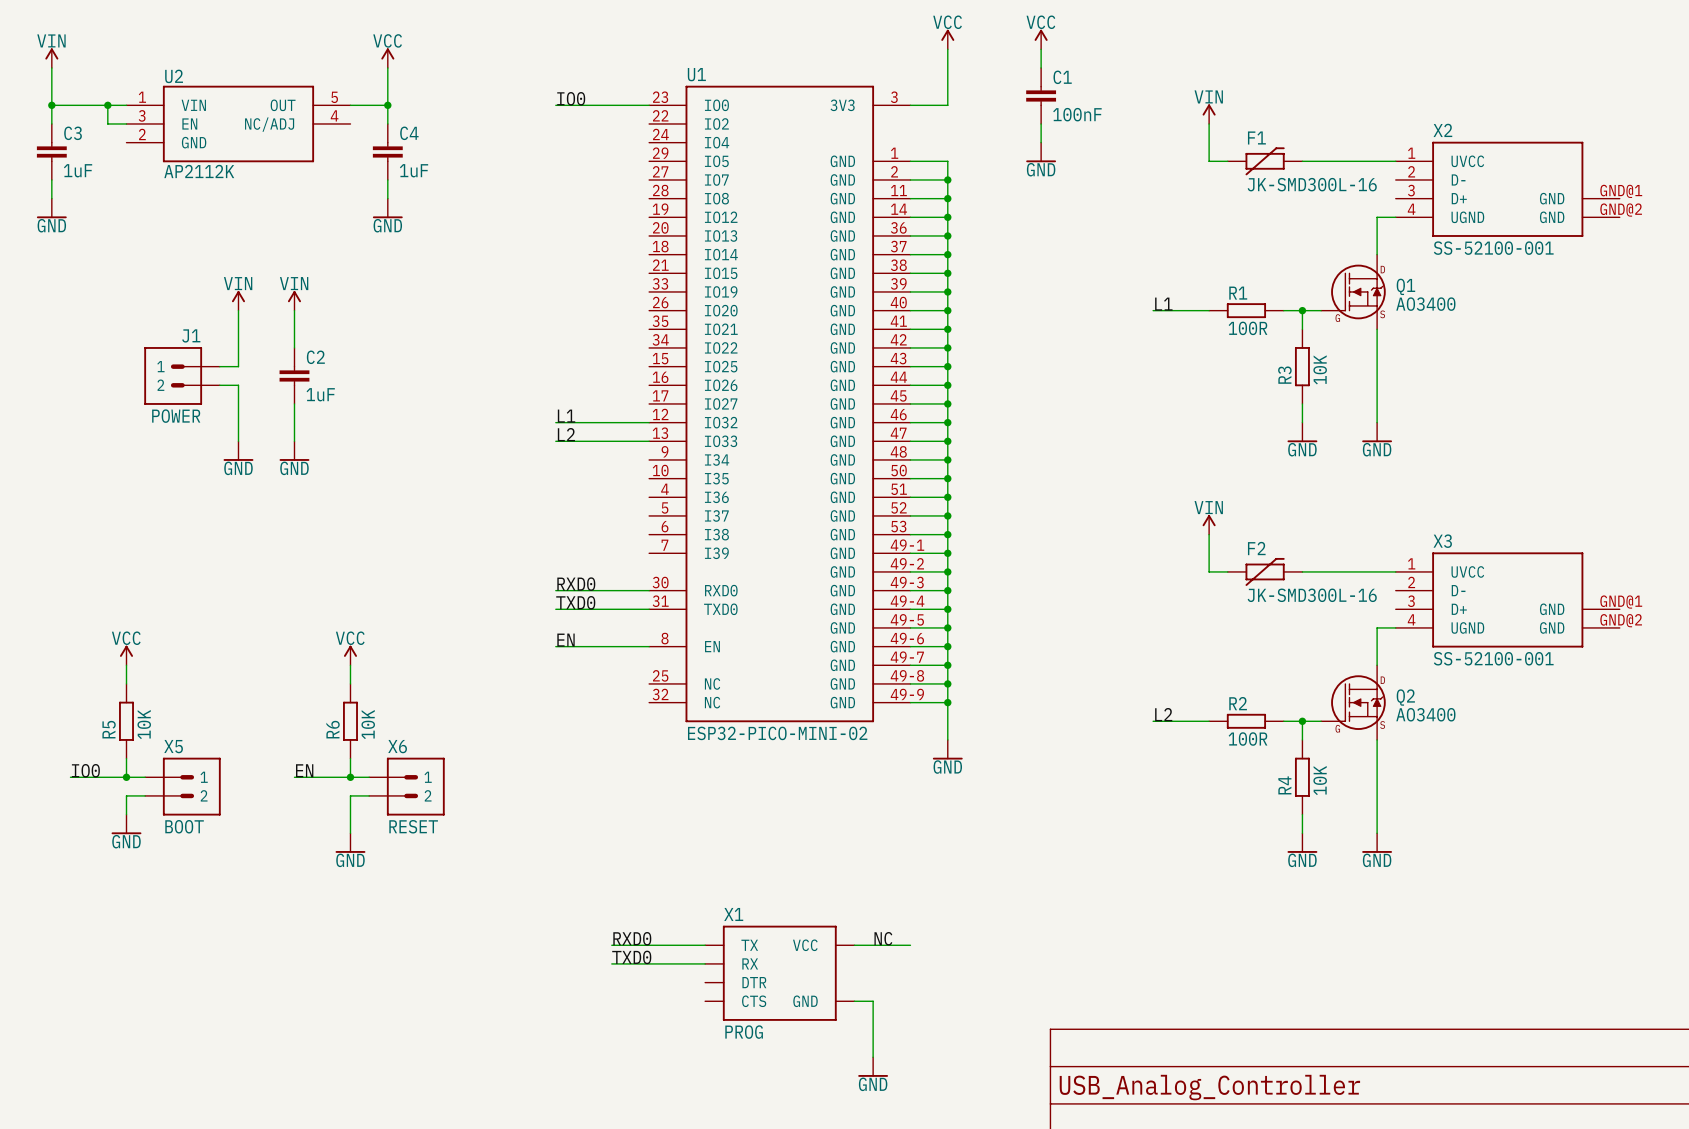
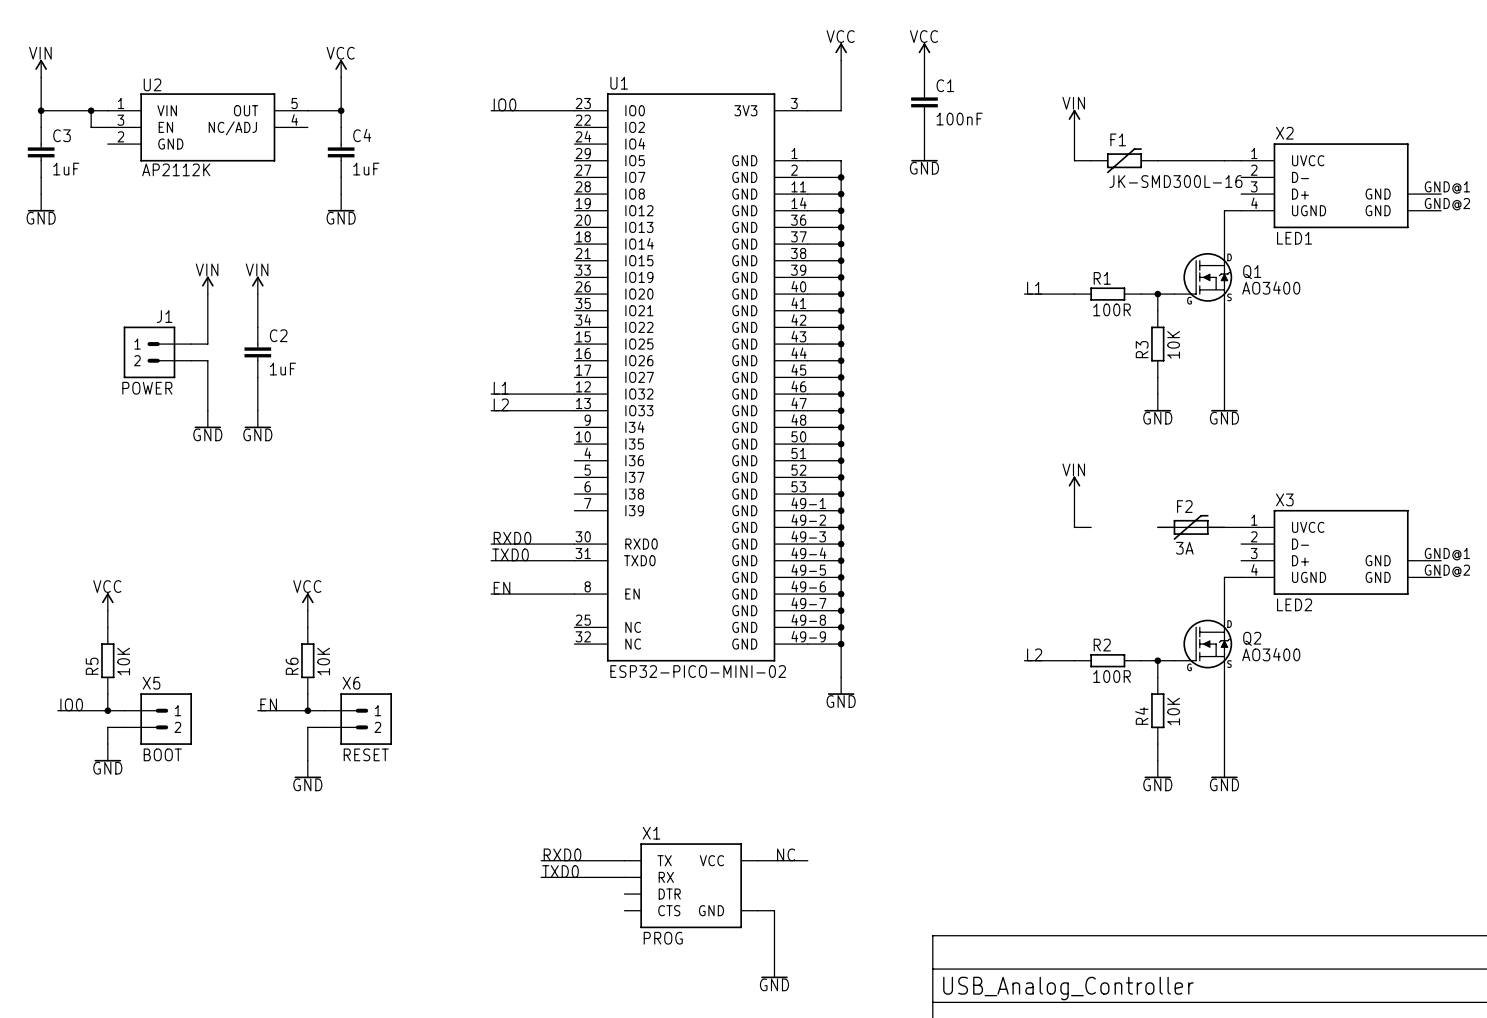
X2 value: SS-52100-001 (1493, 248) -> LED1 (1294, 238)
F2 position: (1265, 571) -> (1191, 527)
F2 value: JK-SMD300L-16 (1312, 595) -> 3A (1184, 548)
X3 value: SS-52100-001 (1493, 658) -> LED2 (1294, 604)

